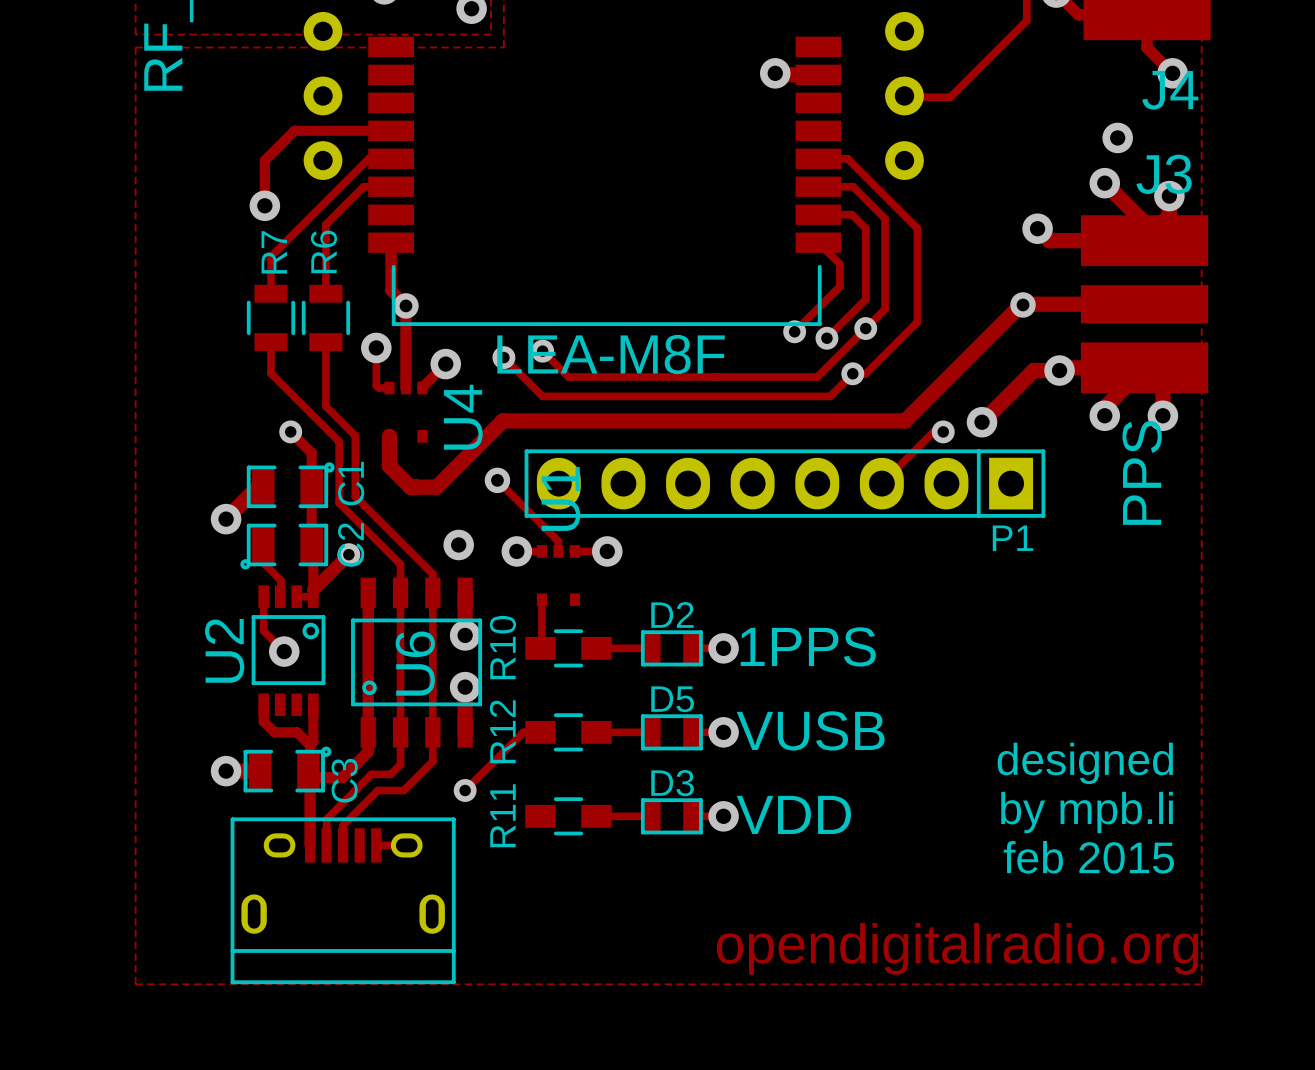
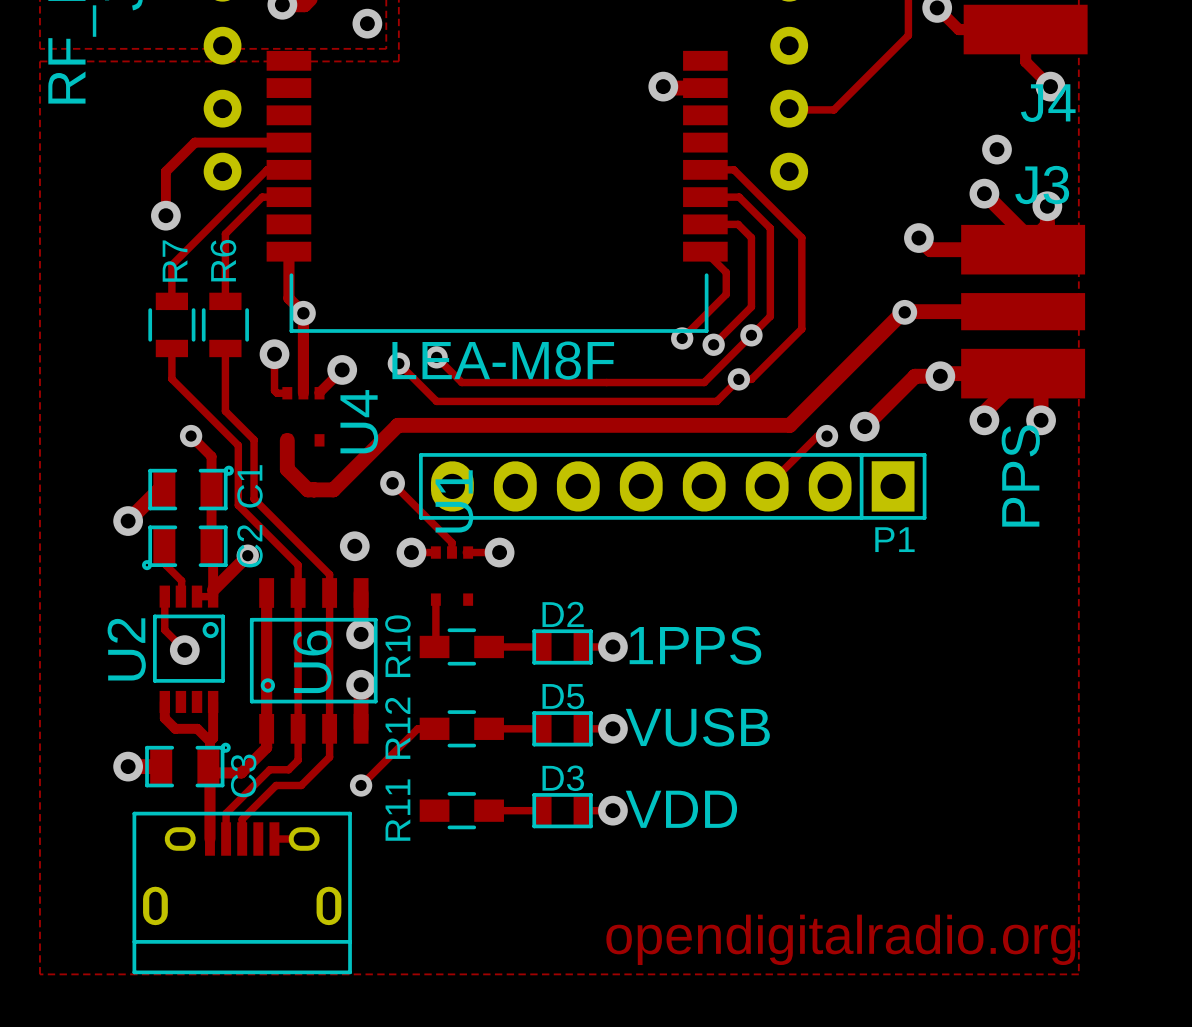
text: designed (1085, 763) -> none
text: by mpb.li (1087, 812) -> none
text: feb 2015 (1088, 857) -> none

